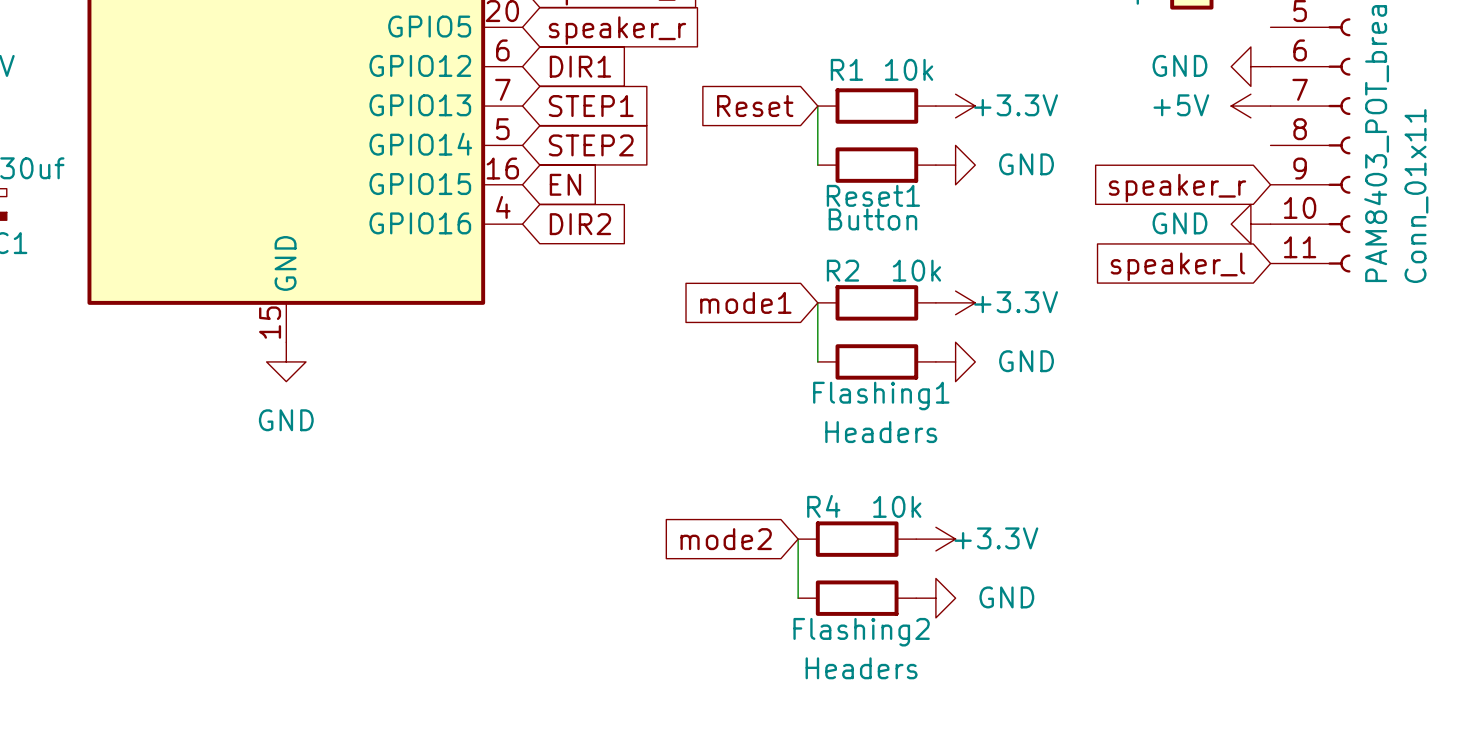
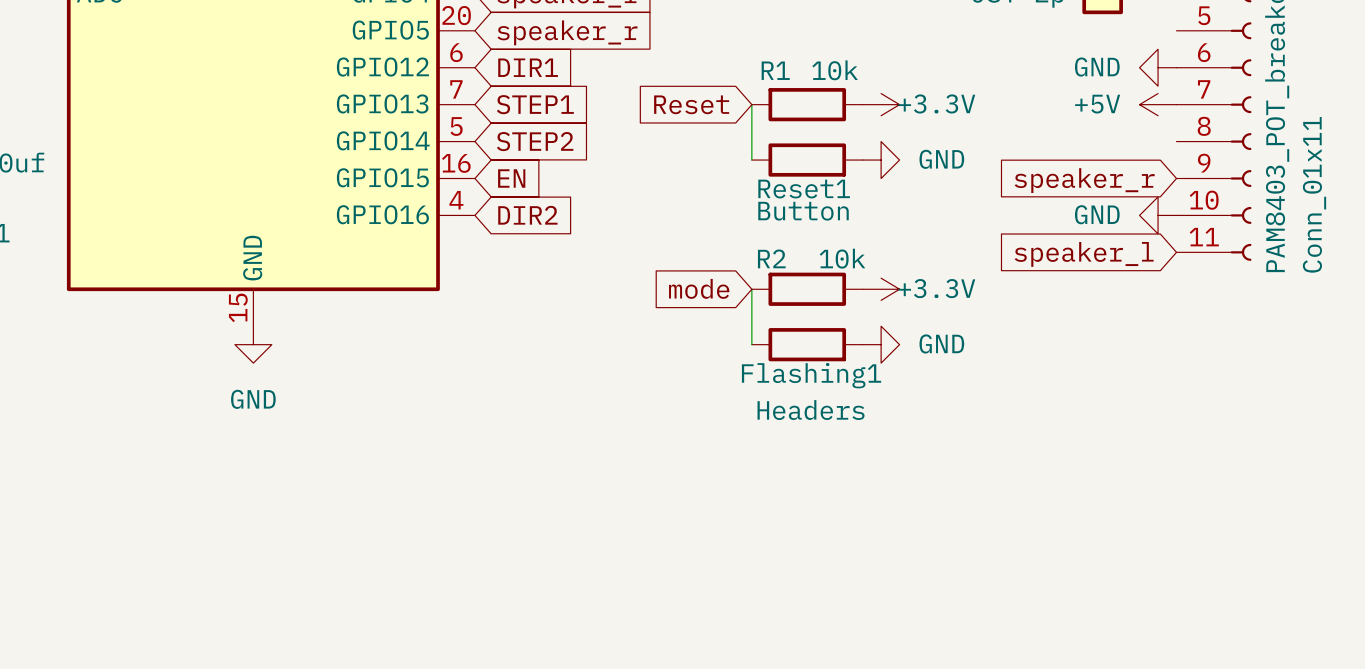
global label: mode1 (745, 302) -> mode (699, 288)
global label: mode2 (726, 539) -> none
wire: (798, 539) (798, 598) -> none
R4: 10k (857, 539) -> none
power symbol: +3.3V (935, 539) -> none
Flashing2: Headers (857, 598) -> none
power symbol: GND (935, 598) -> none

